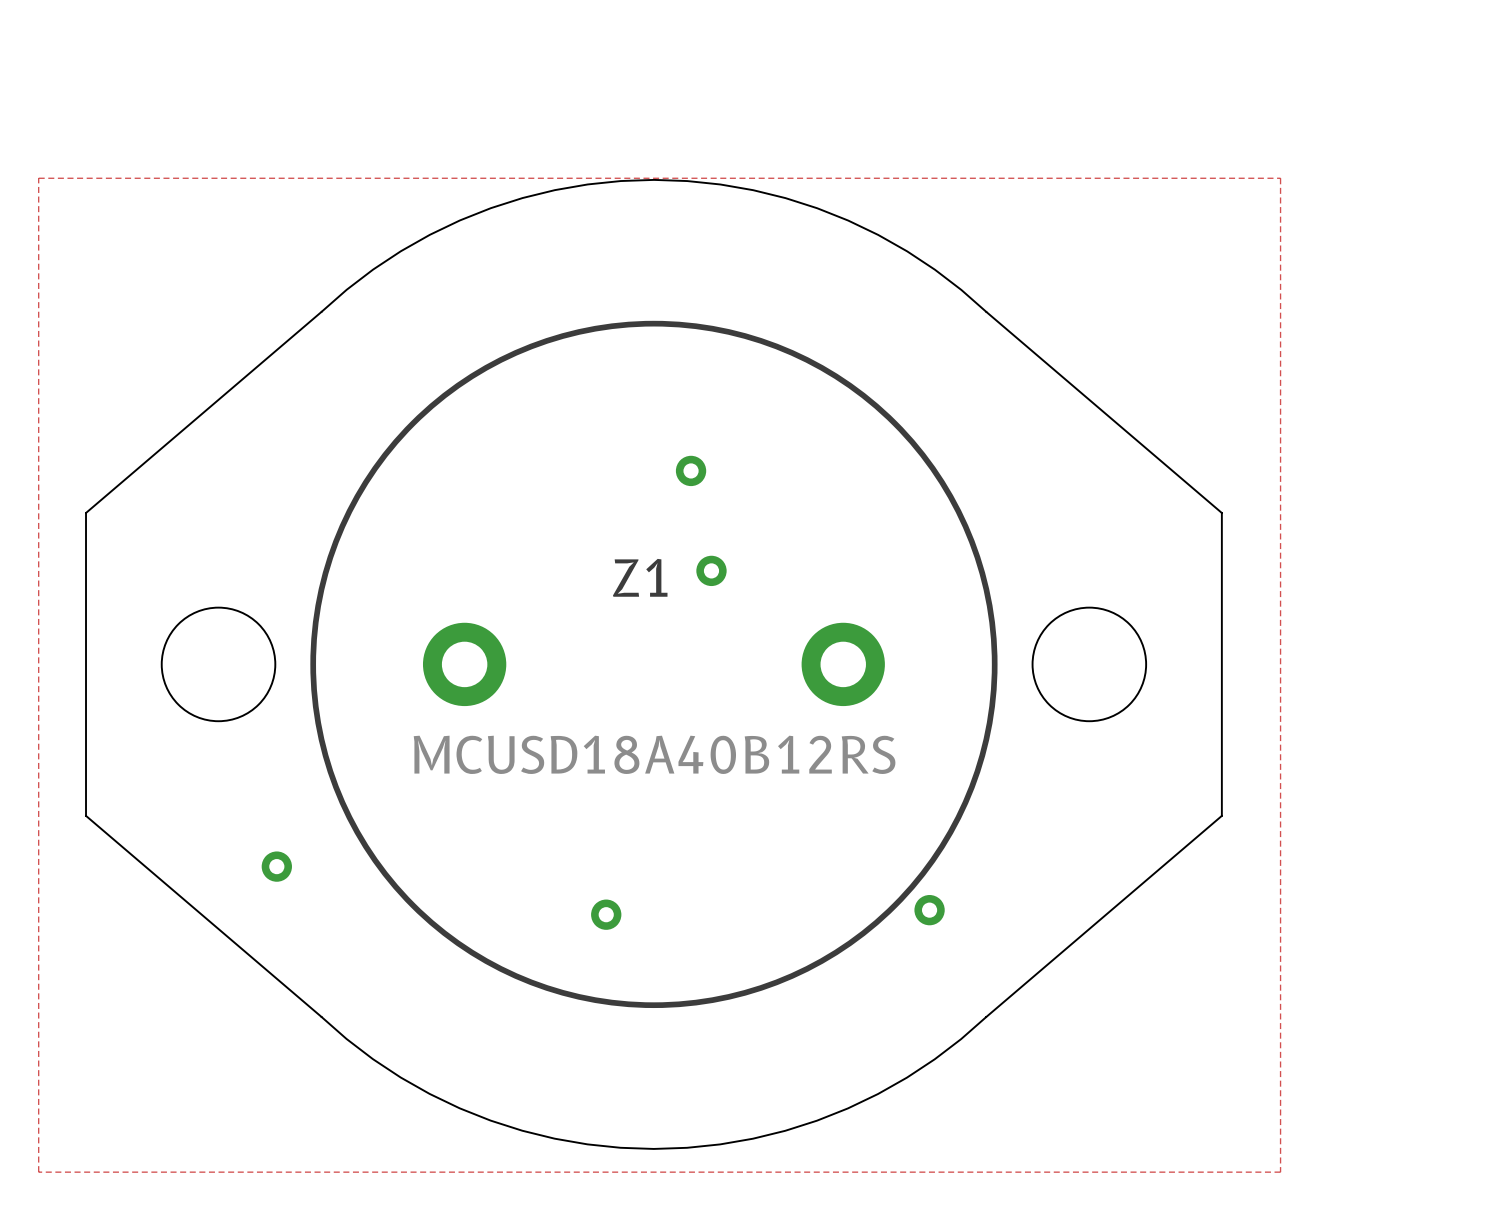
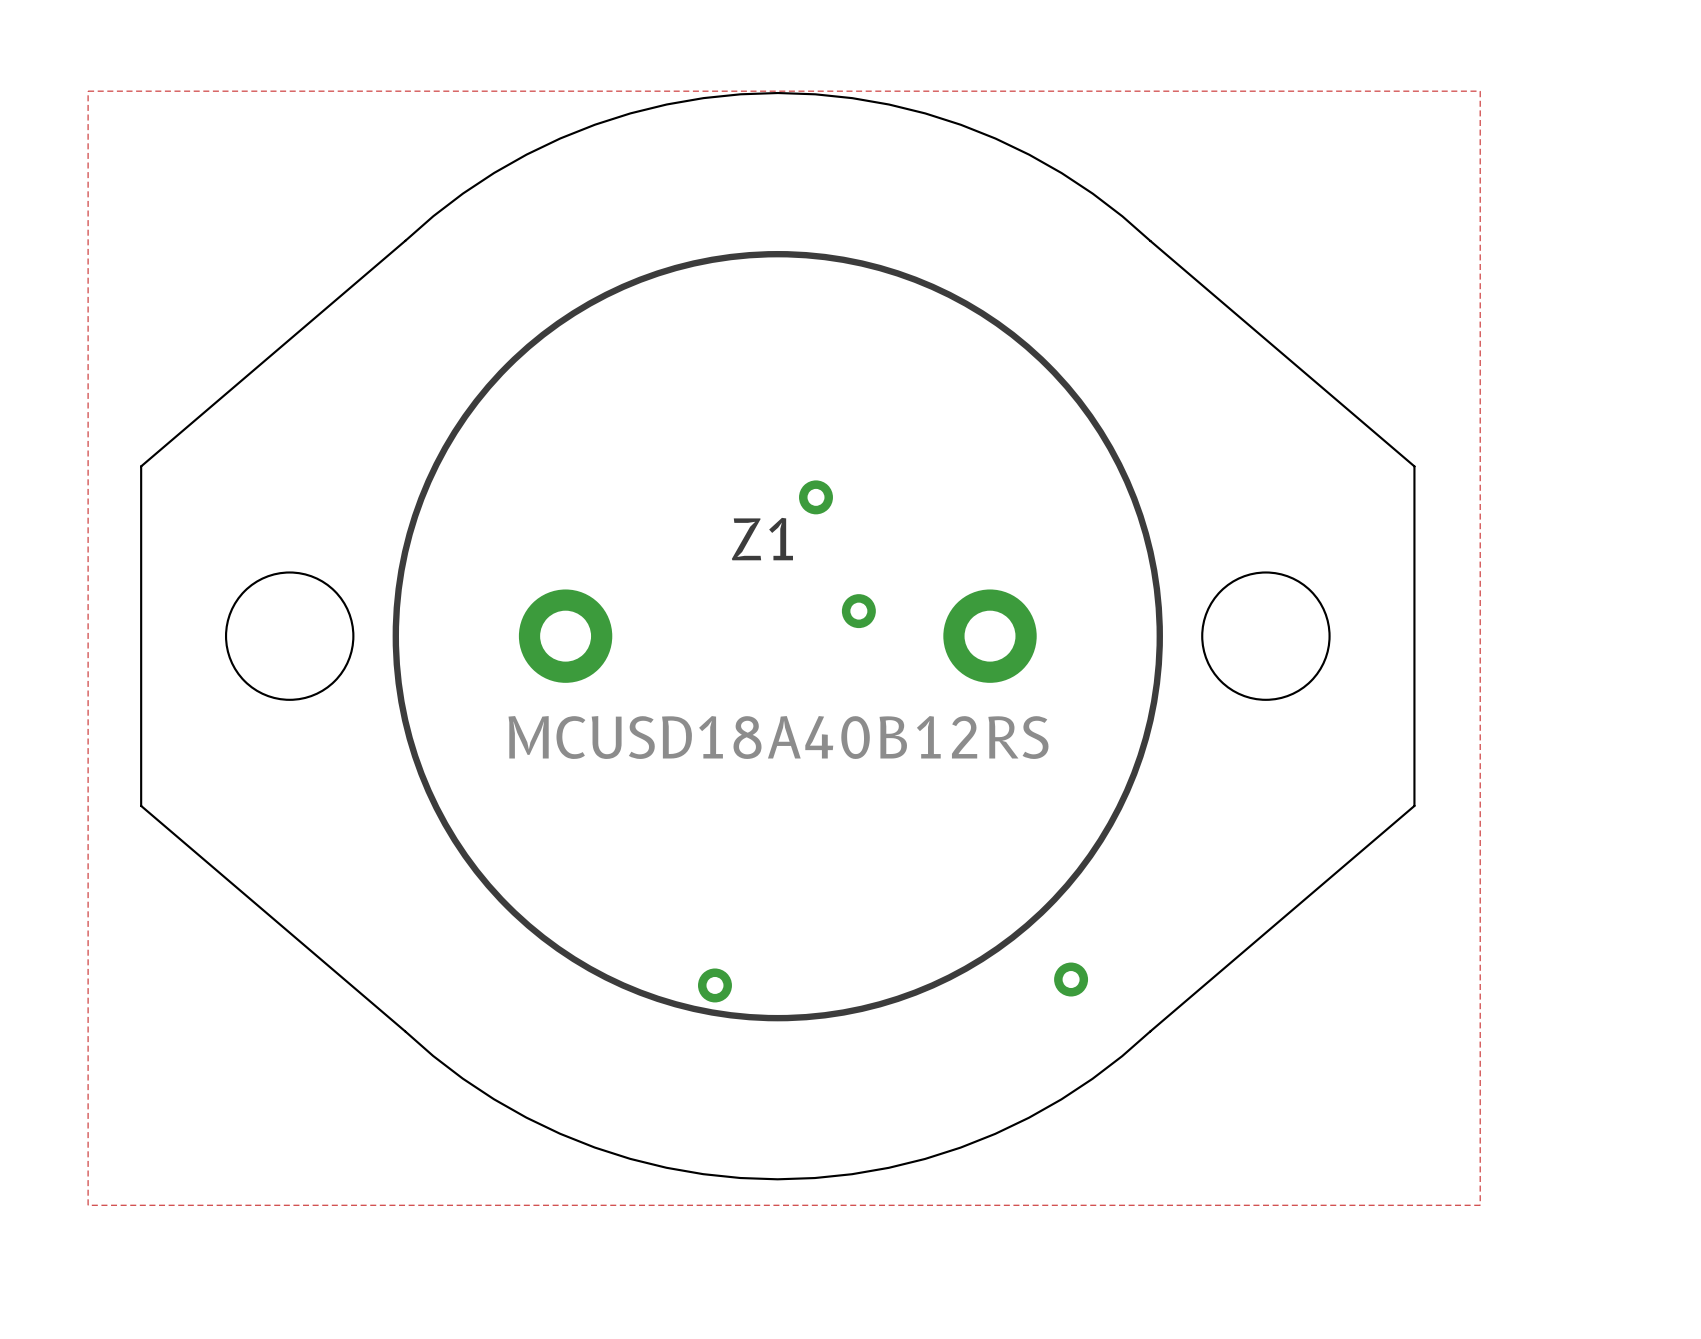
via: (691, 470) -> none
via: none -> (816, 497)
via: (711, 570) -> none
via: none -> (858, 611)
via: (276, 866) -> none
via position: (929, 910) -> (1071, 979)
via position: (606, 914) -> (714, 985)

